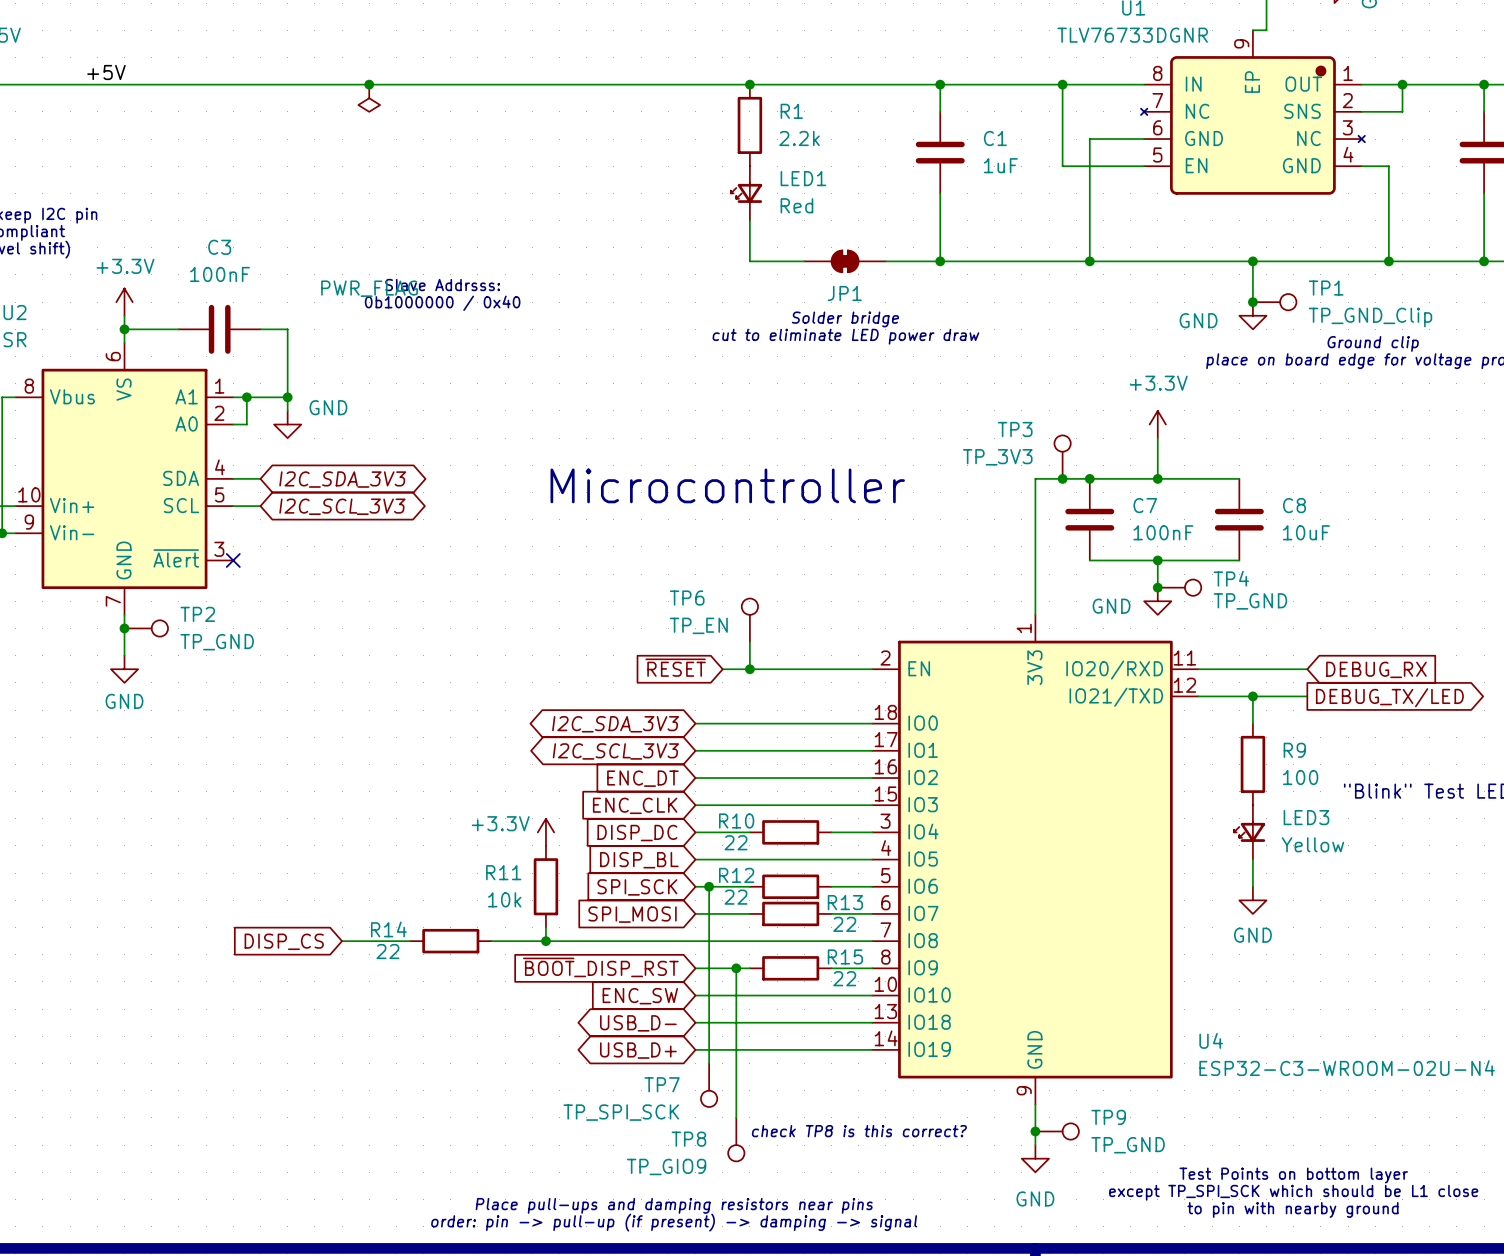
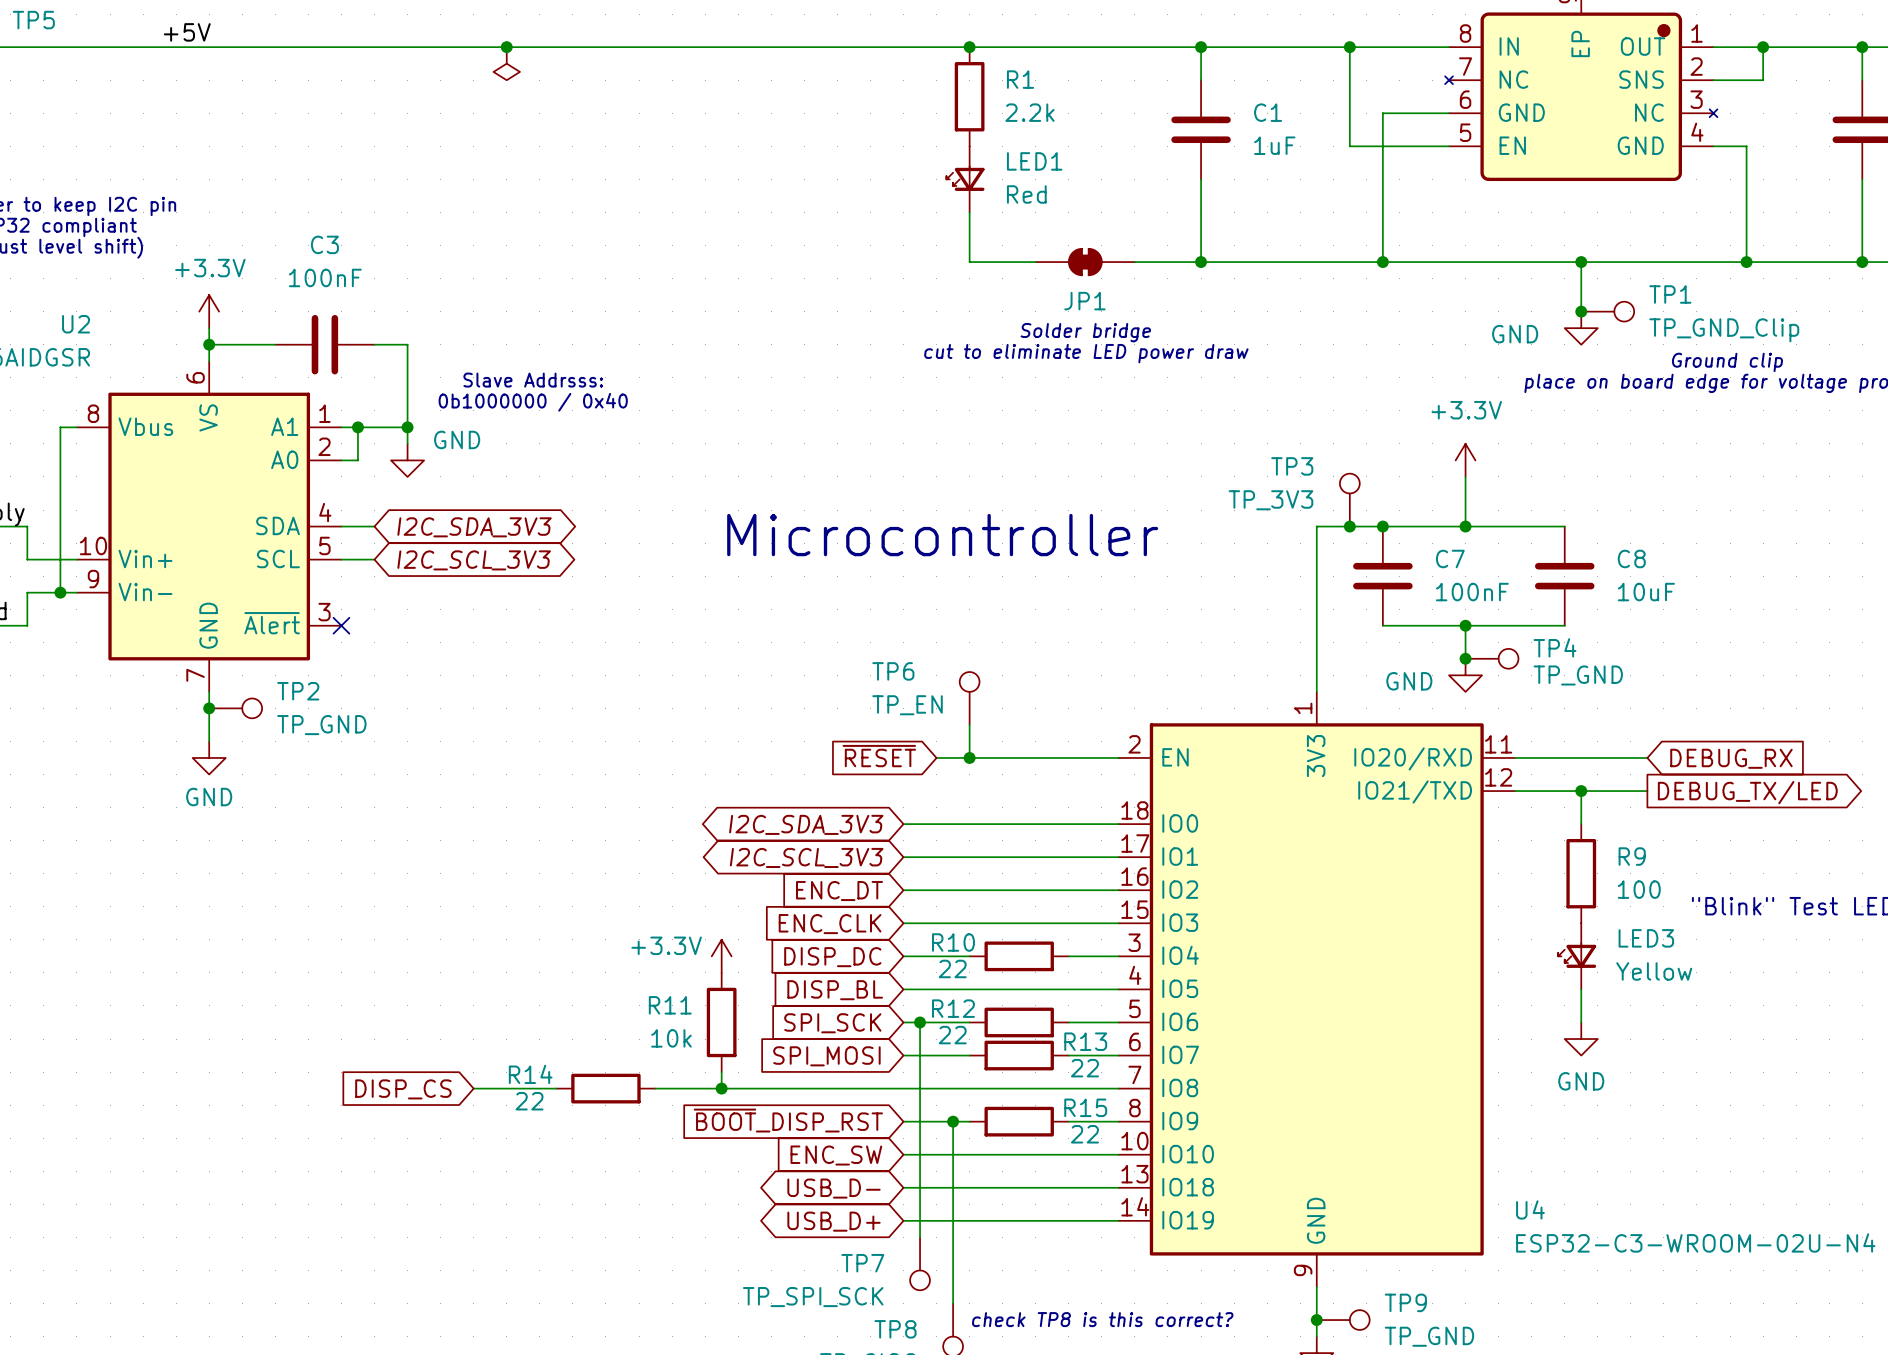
text position: Slave Addrsss: (442, 285) -> Slave Addrsss: (533, 380)
power symbol text: PWR_FLAG (369, 288) -> none
text position: 0b1000000 / 0x40 (442, 303) -> 0b1000000 / 0x40 (533, 402)

